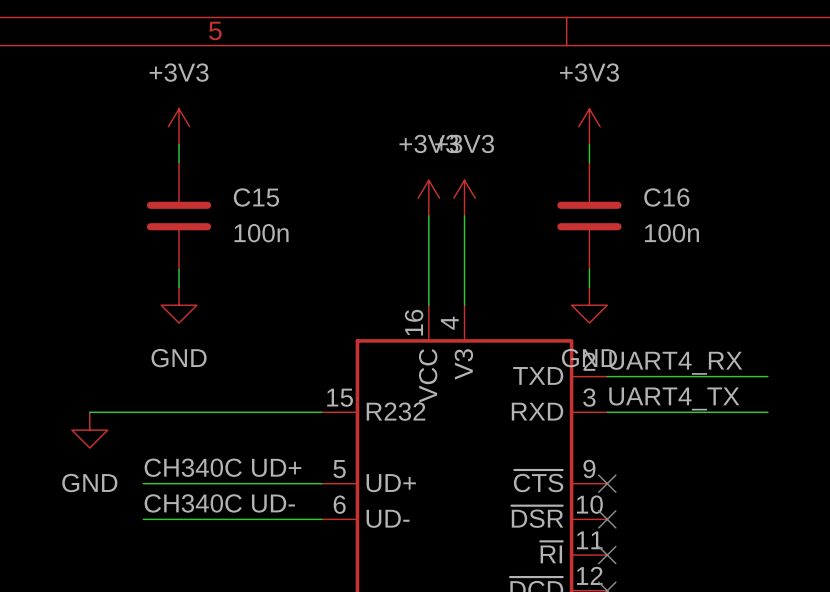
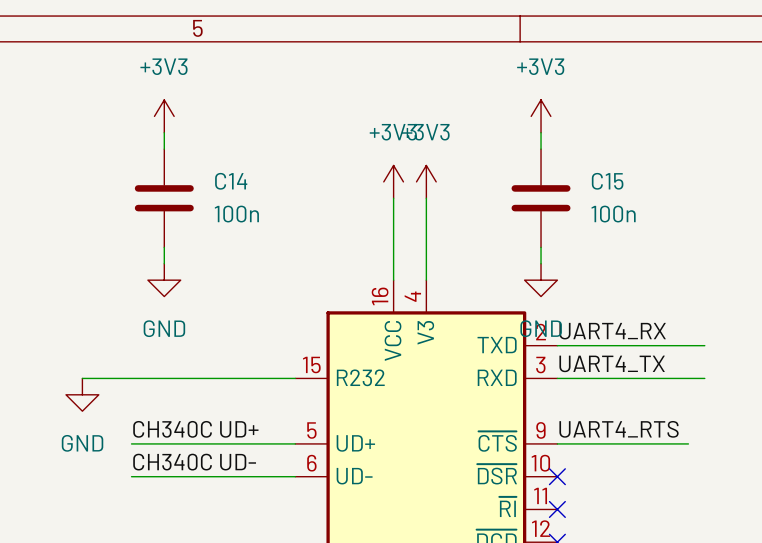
C15 name: C15 (256, 197) -> C14 (231, 181)
C16 name: C16 (666, 197) -> C15 (607, 181)
label: none -> UART4_RTS (619, 429)
wire: none -> (557, 443) (688, 443)
no-connect mark: (607, 483) -> none

